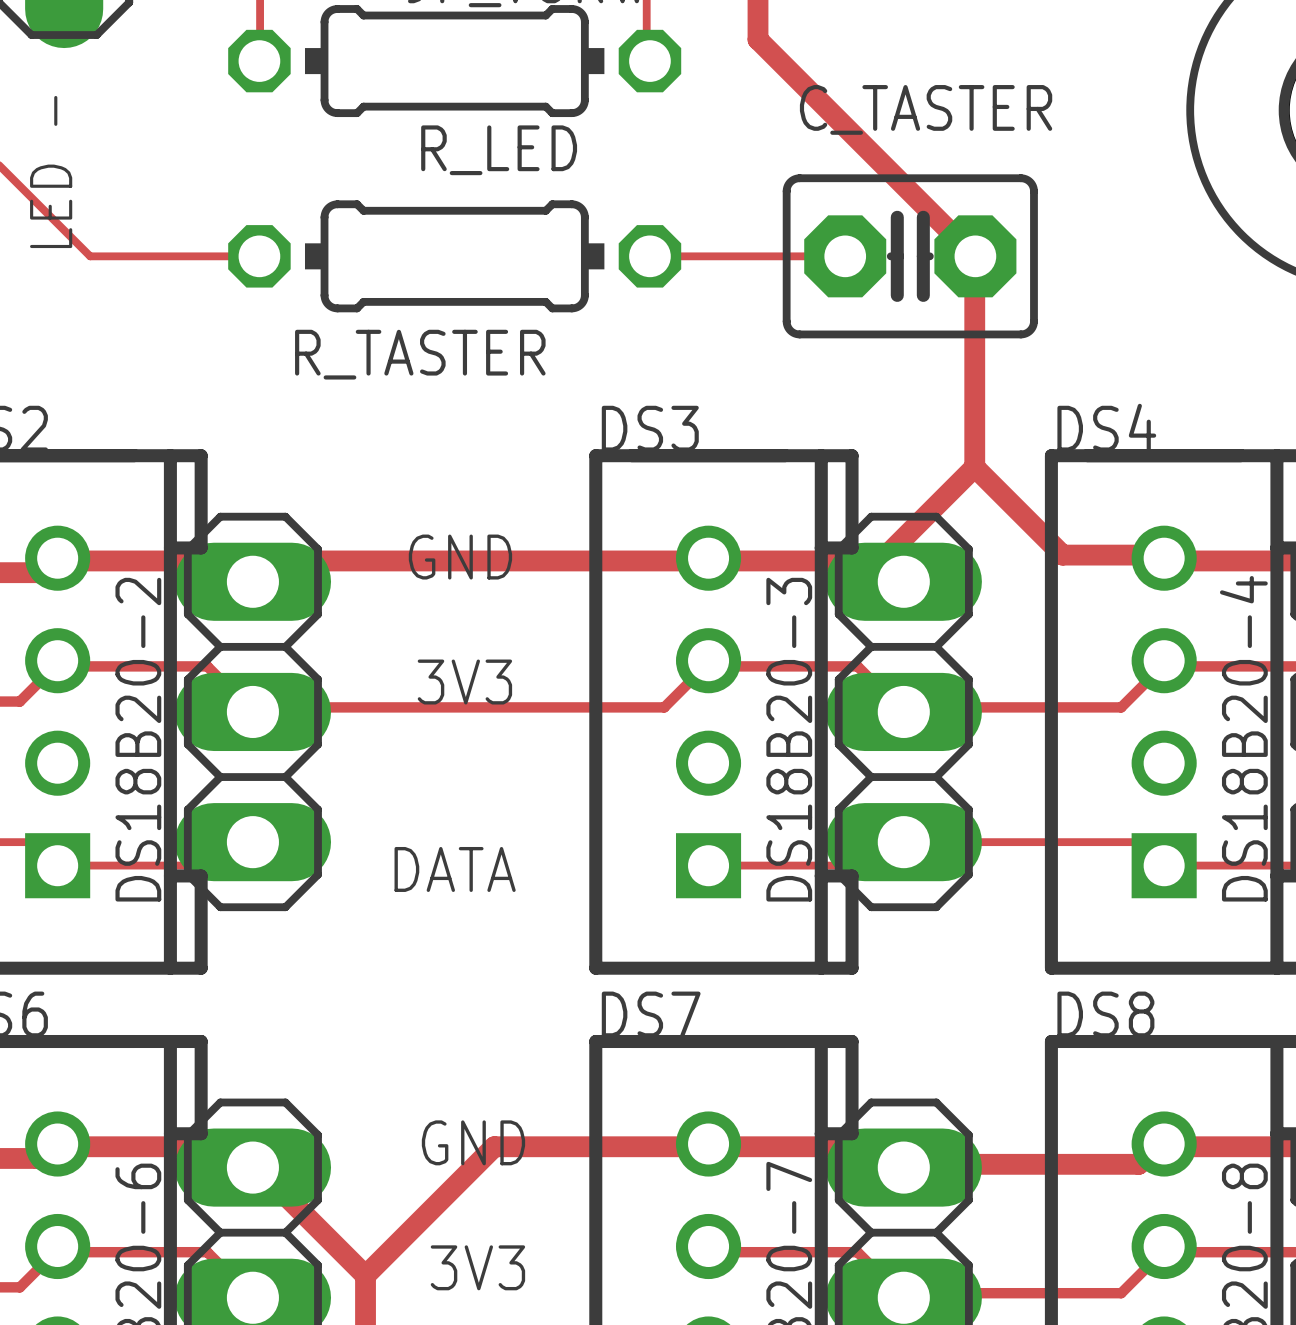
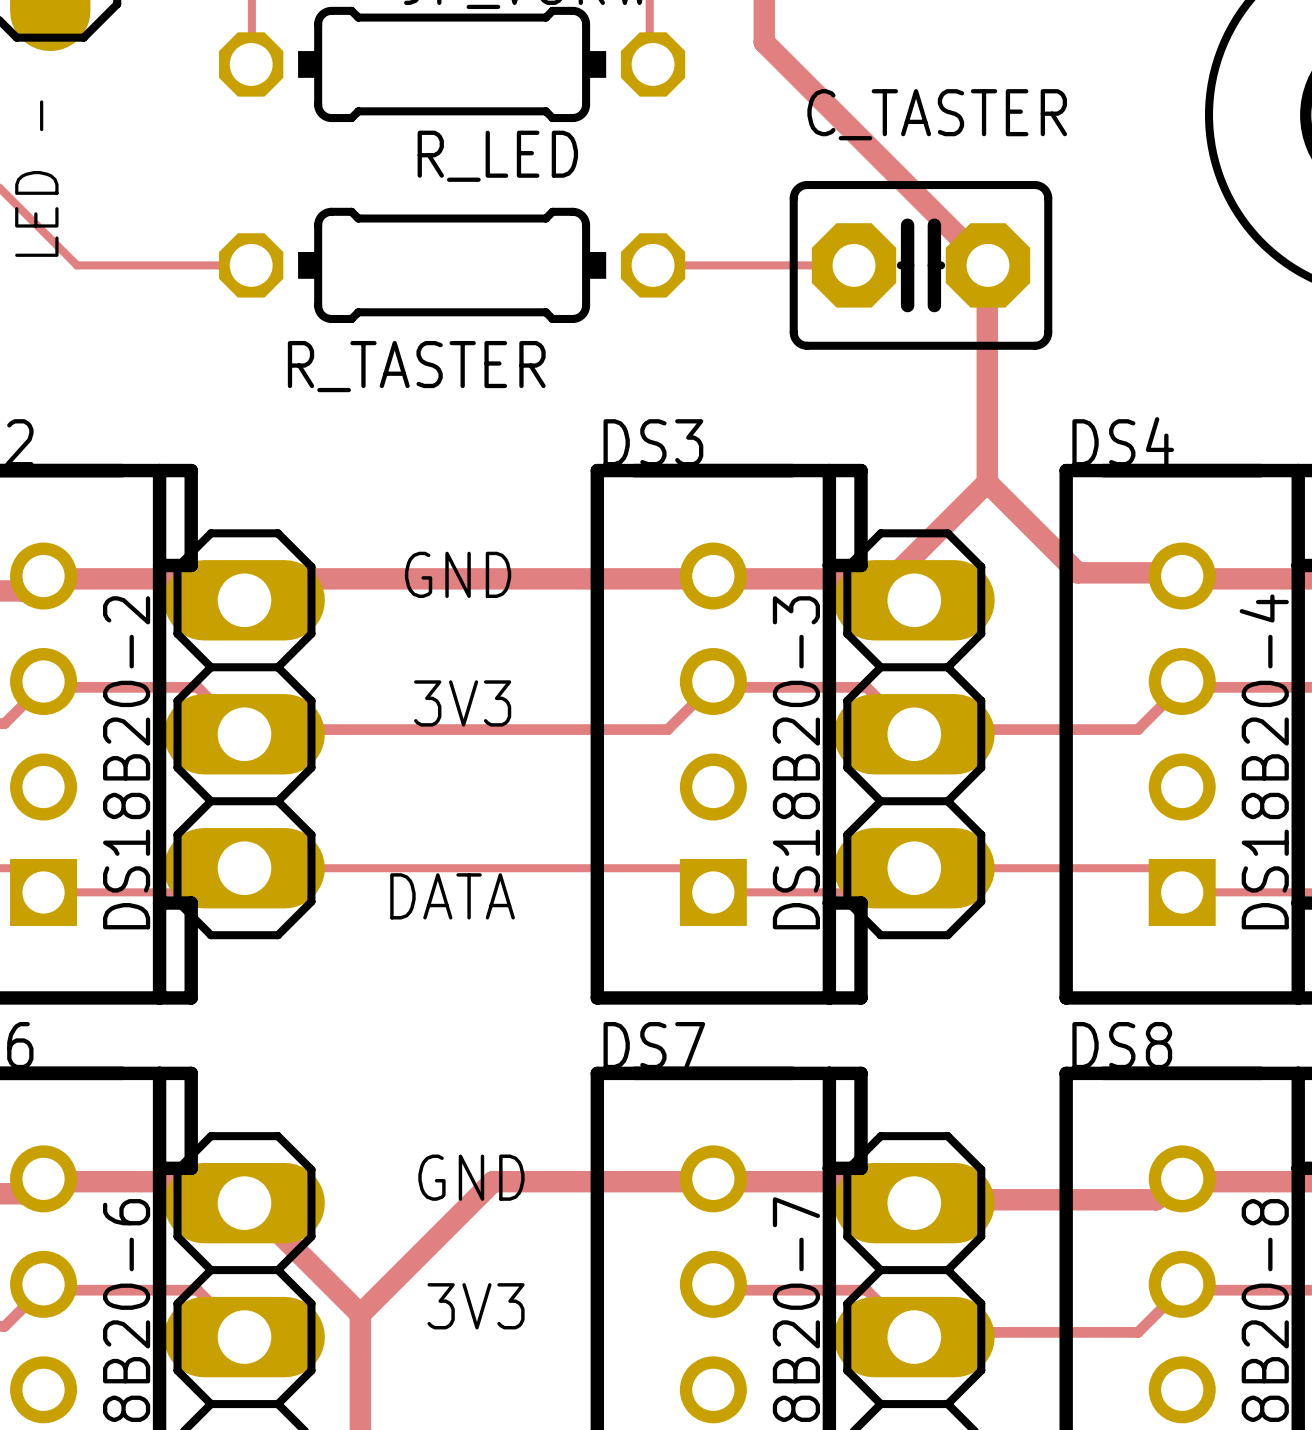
track: none -> (244, 868) (685, 868) (710, 892) (713, 892)

